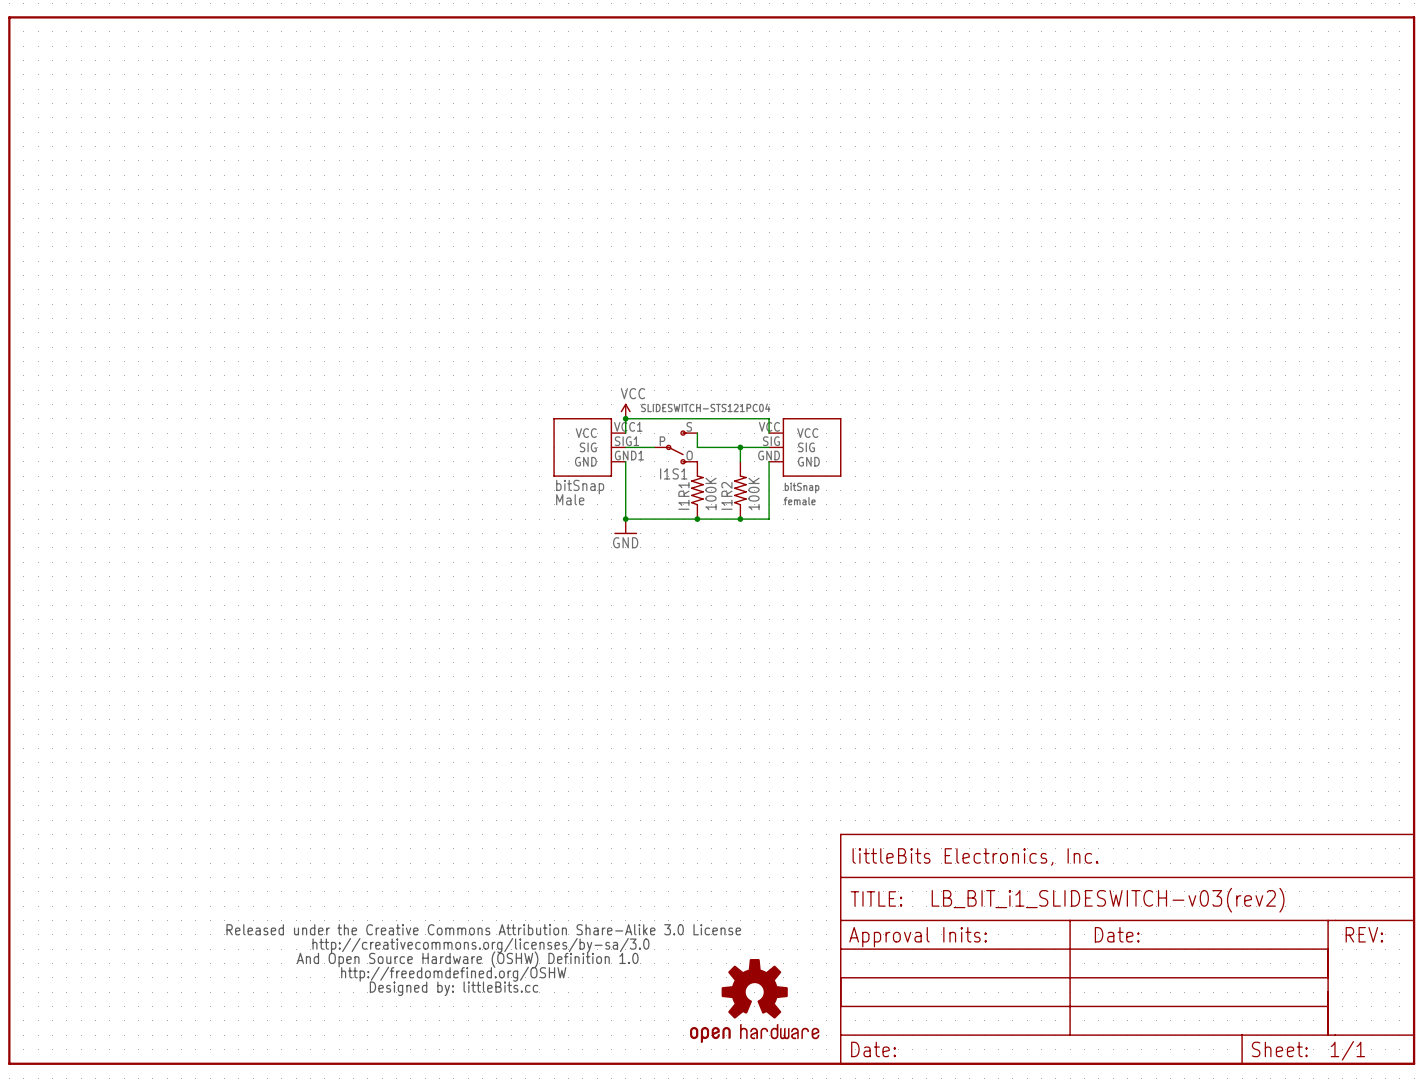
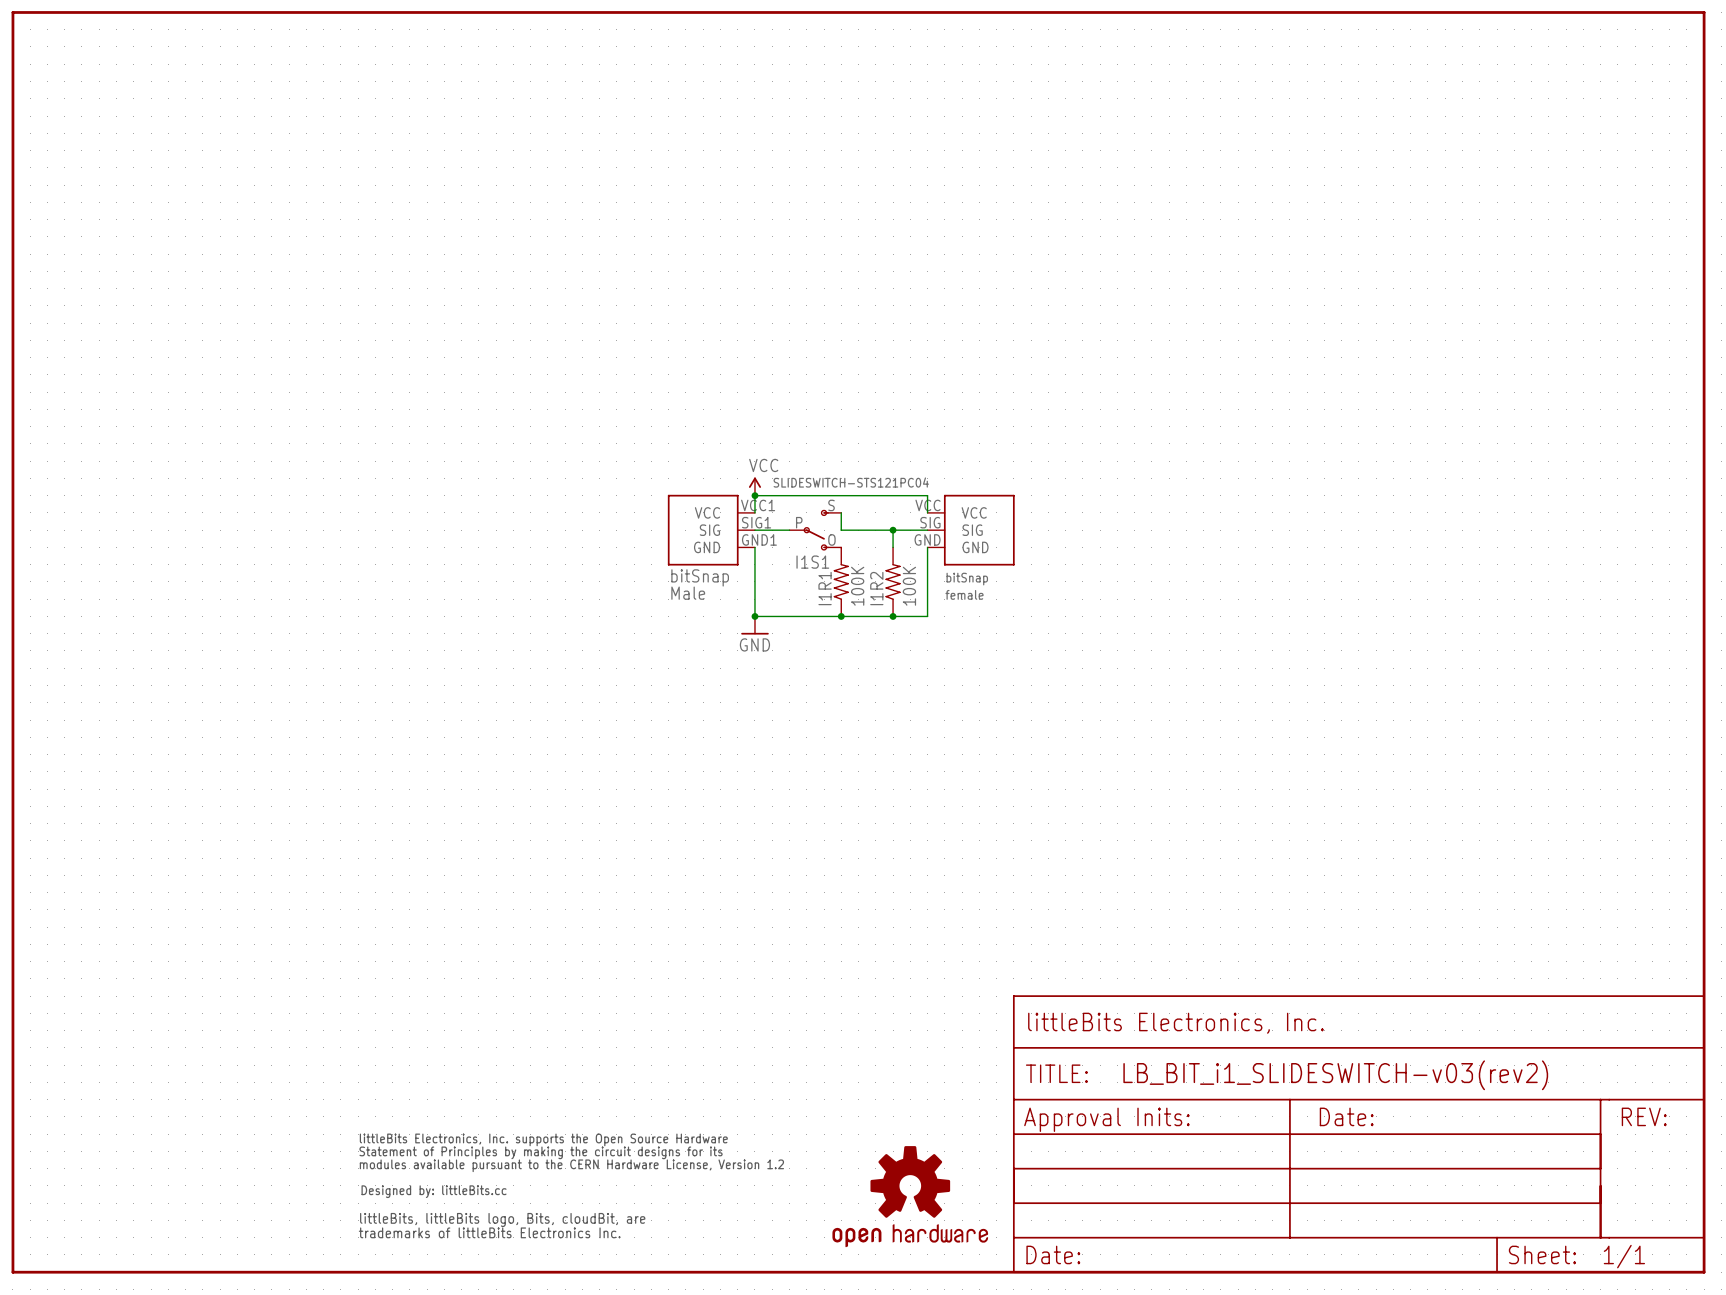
part: (483, 960) -> none
part: none -> (571, 1185)

